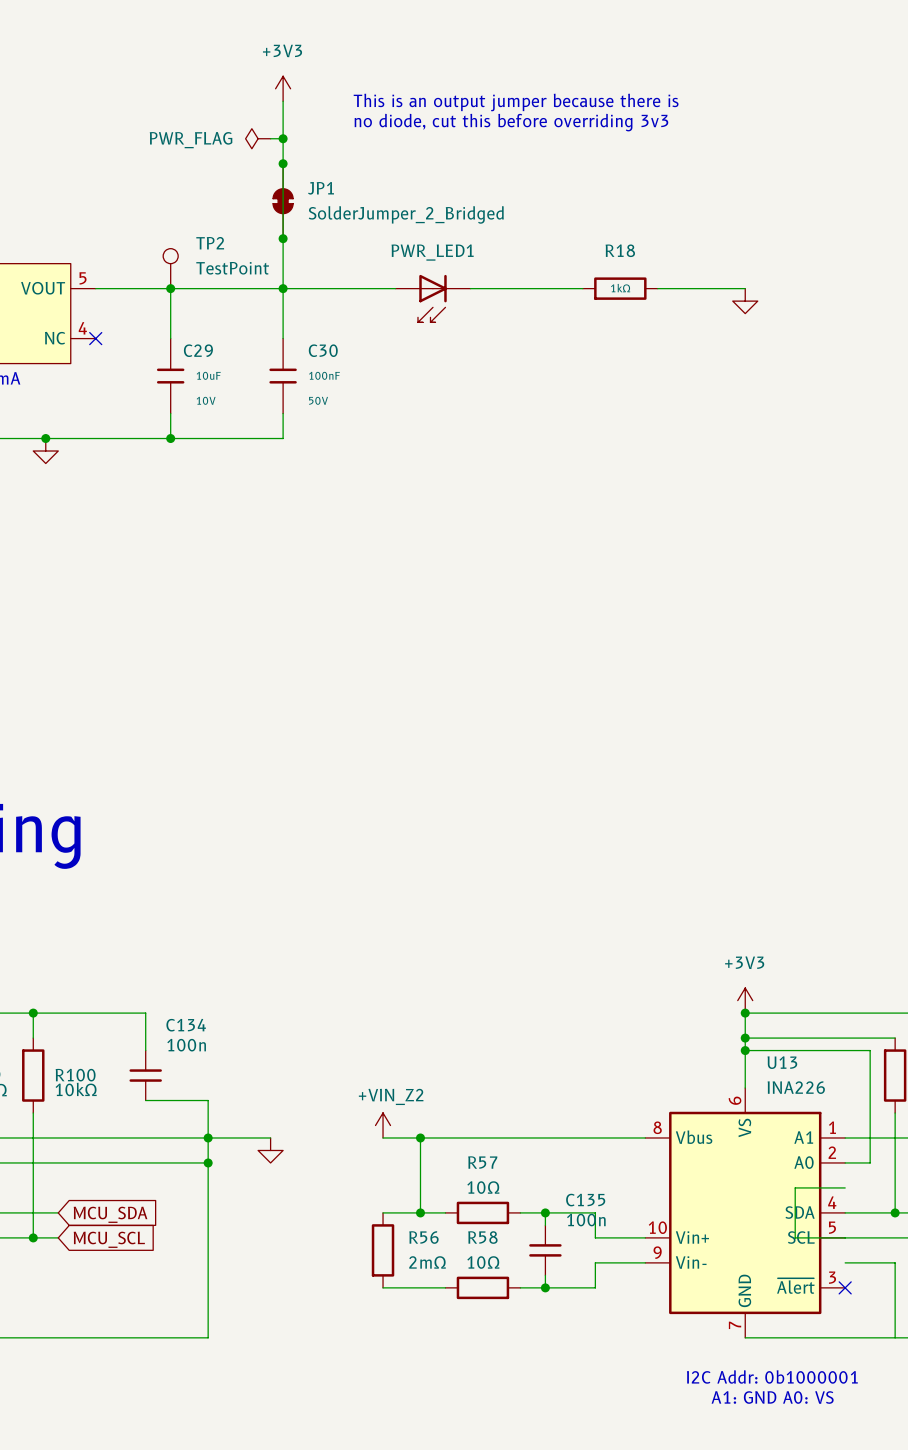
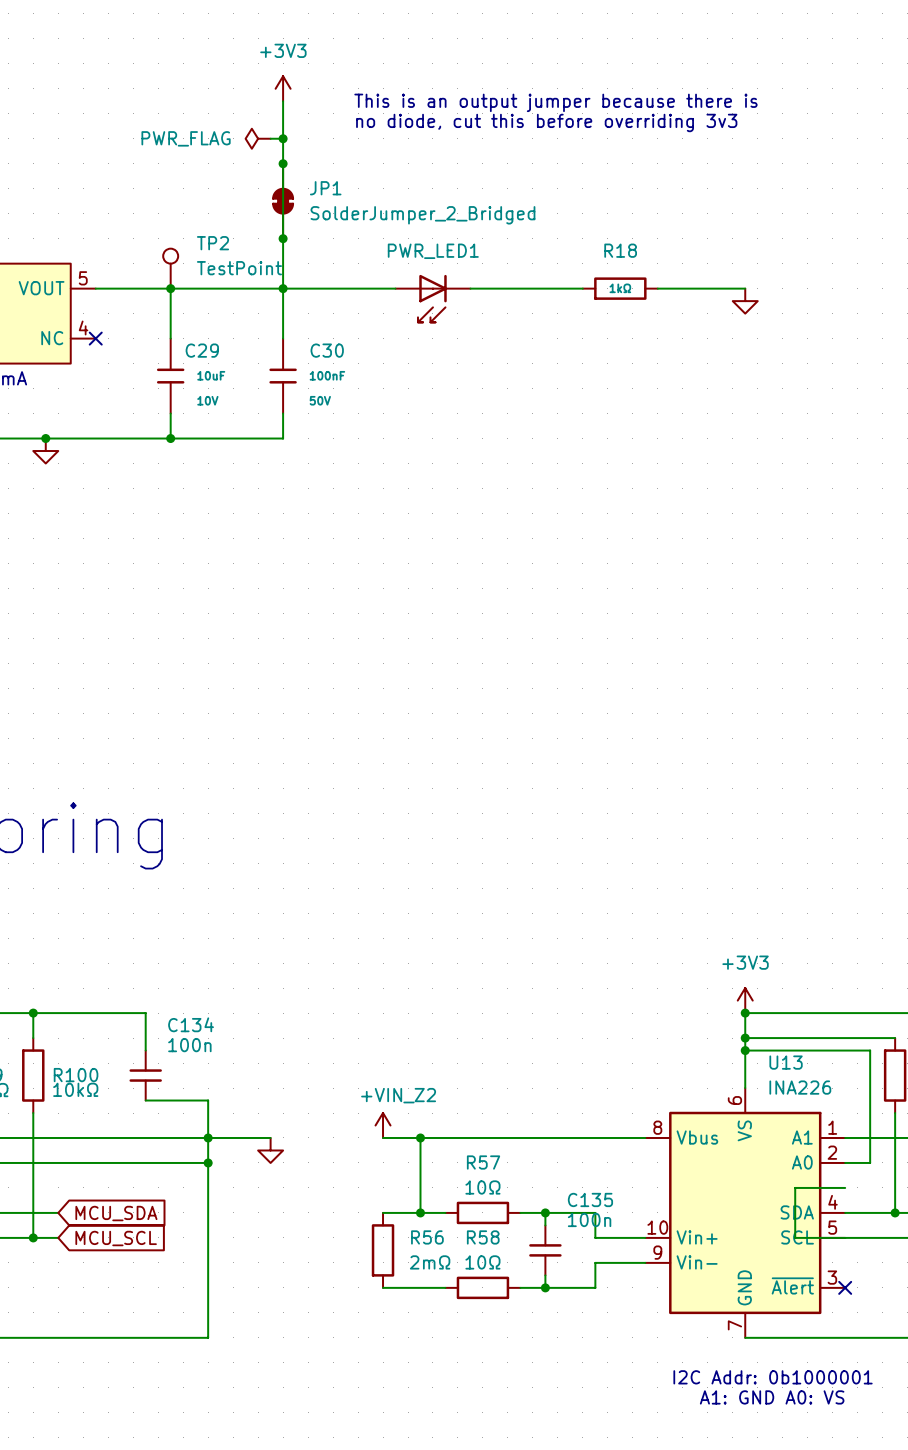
wire: (845, 1262) (895, 1262) (895, 1337) -> none

